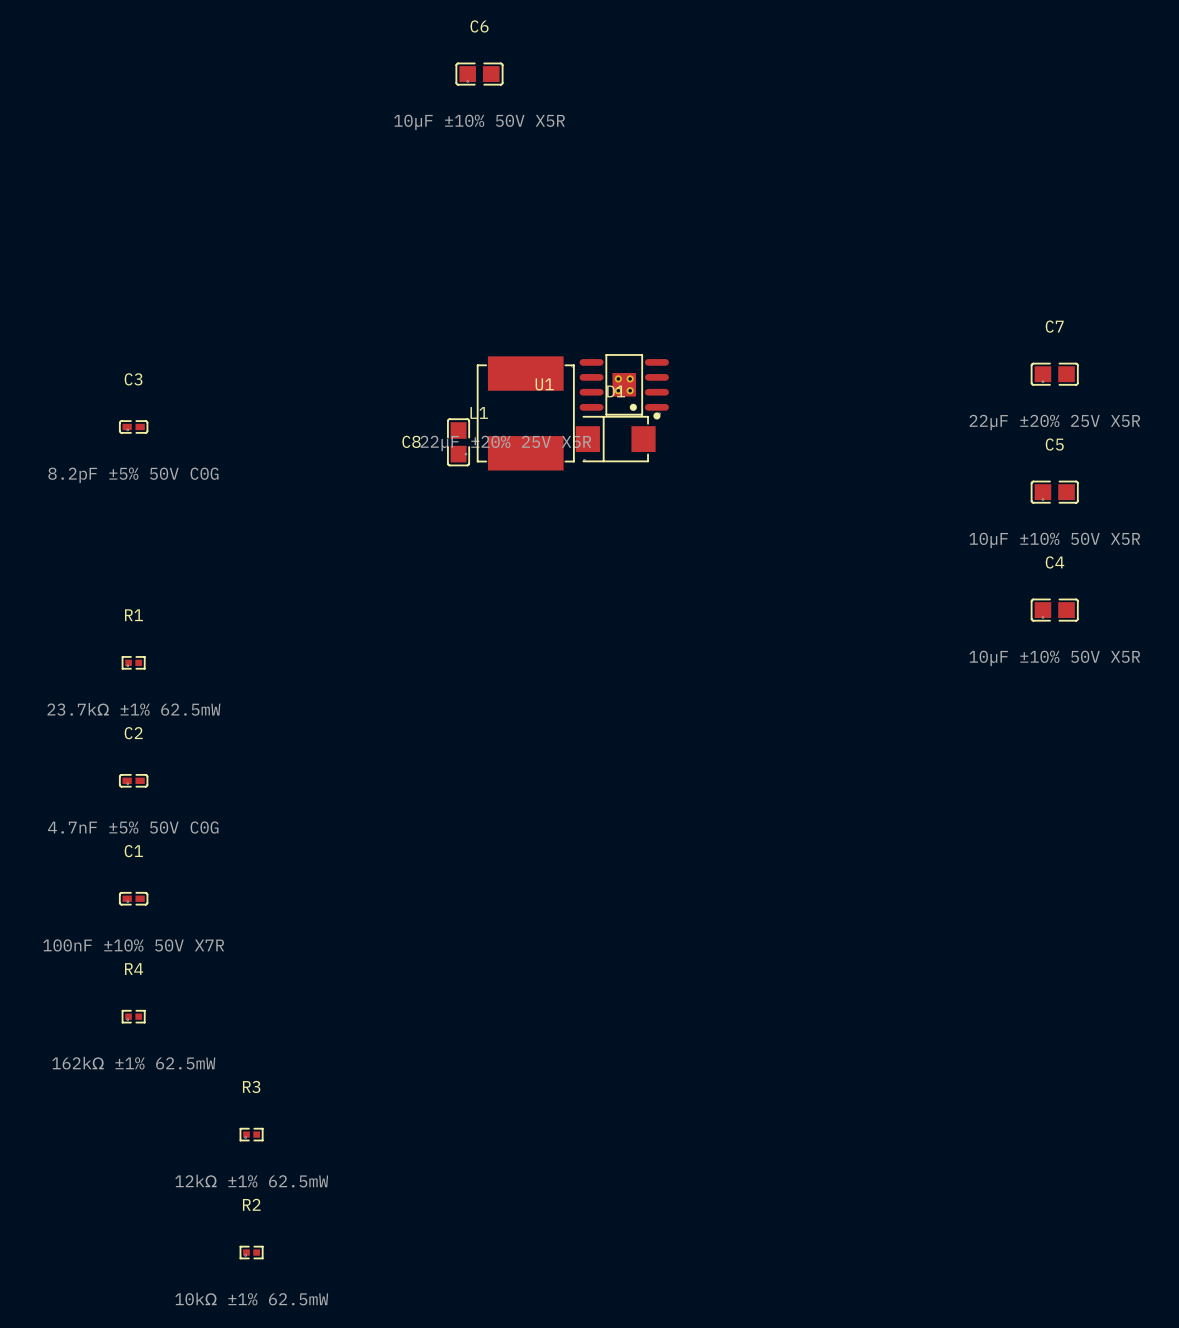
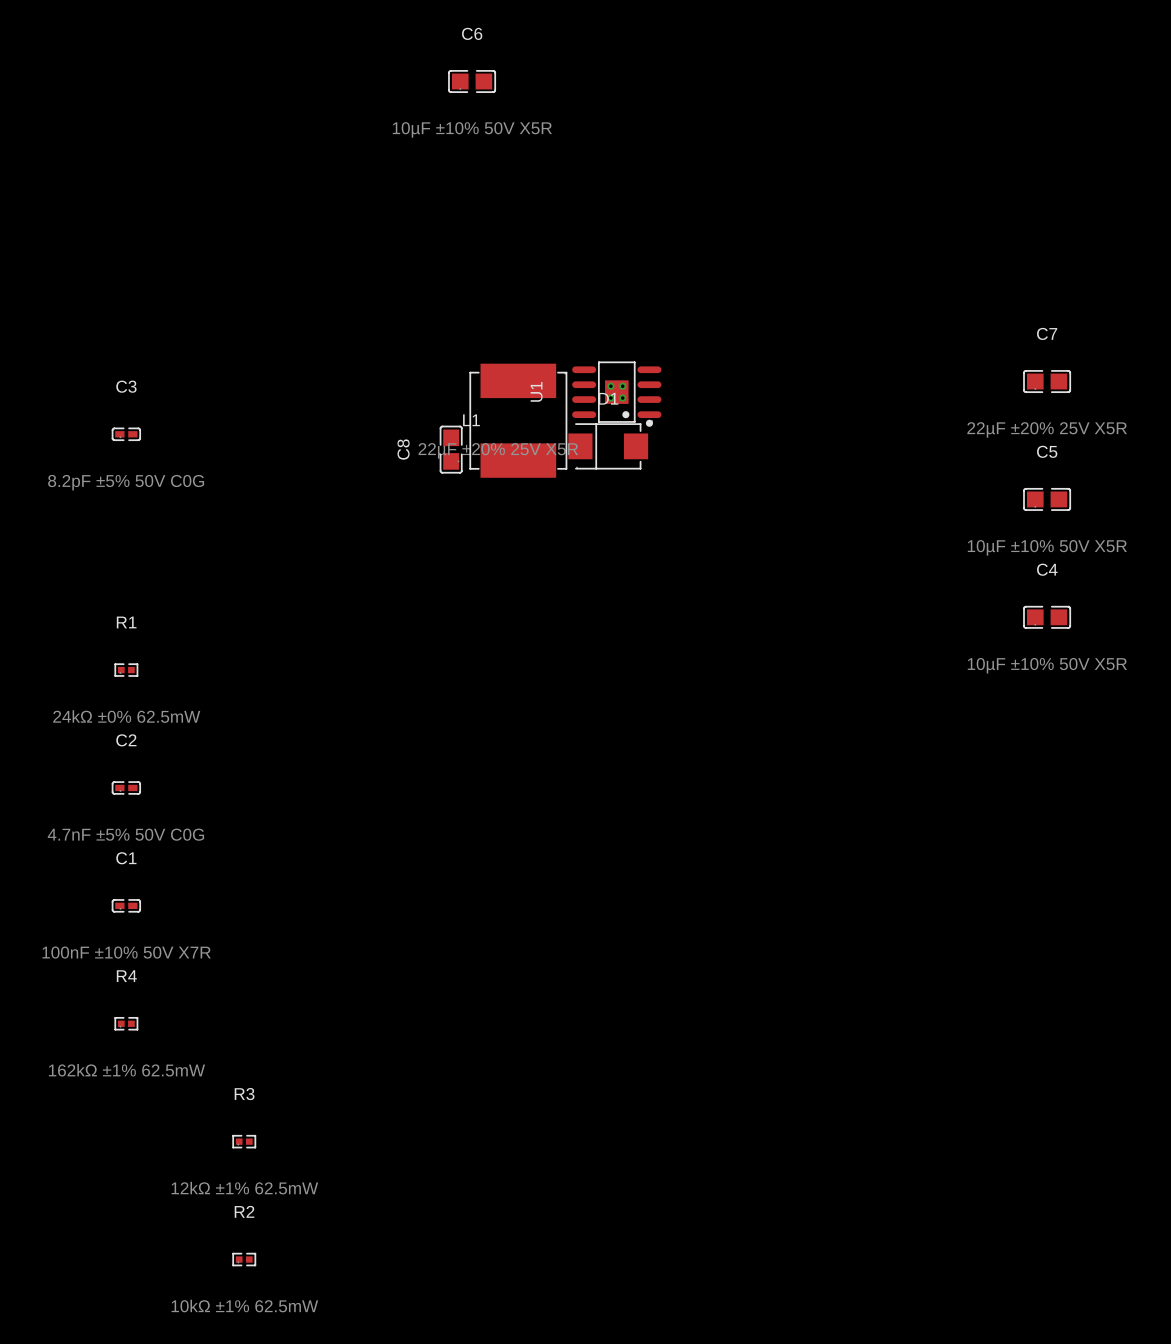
U1 name rotation: 0° (544, 384) -> 90° counterclockwise (536, 391)
C8 name rotation: 0° (411, 441) -> 90° counterclockwise (403, 449)
R1 value: 23.7kΩ ±1% 62.5mW (133, 709) -> 24kΩ ±0% 62.5mW (126, 716)

